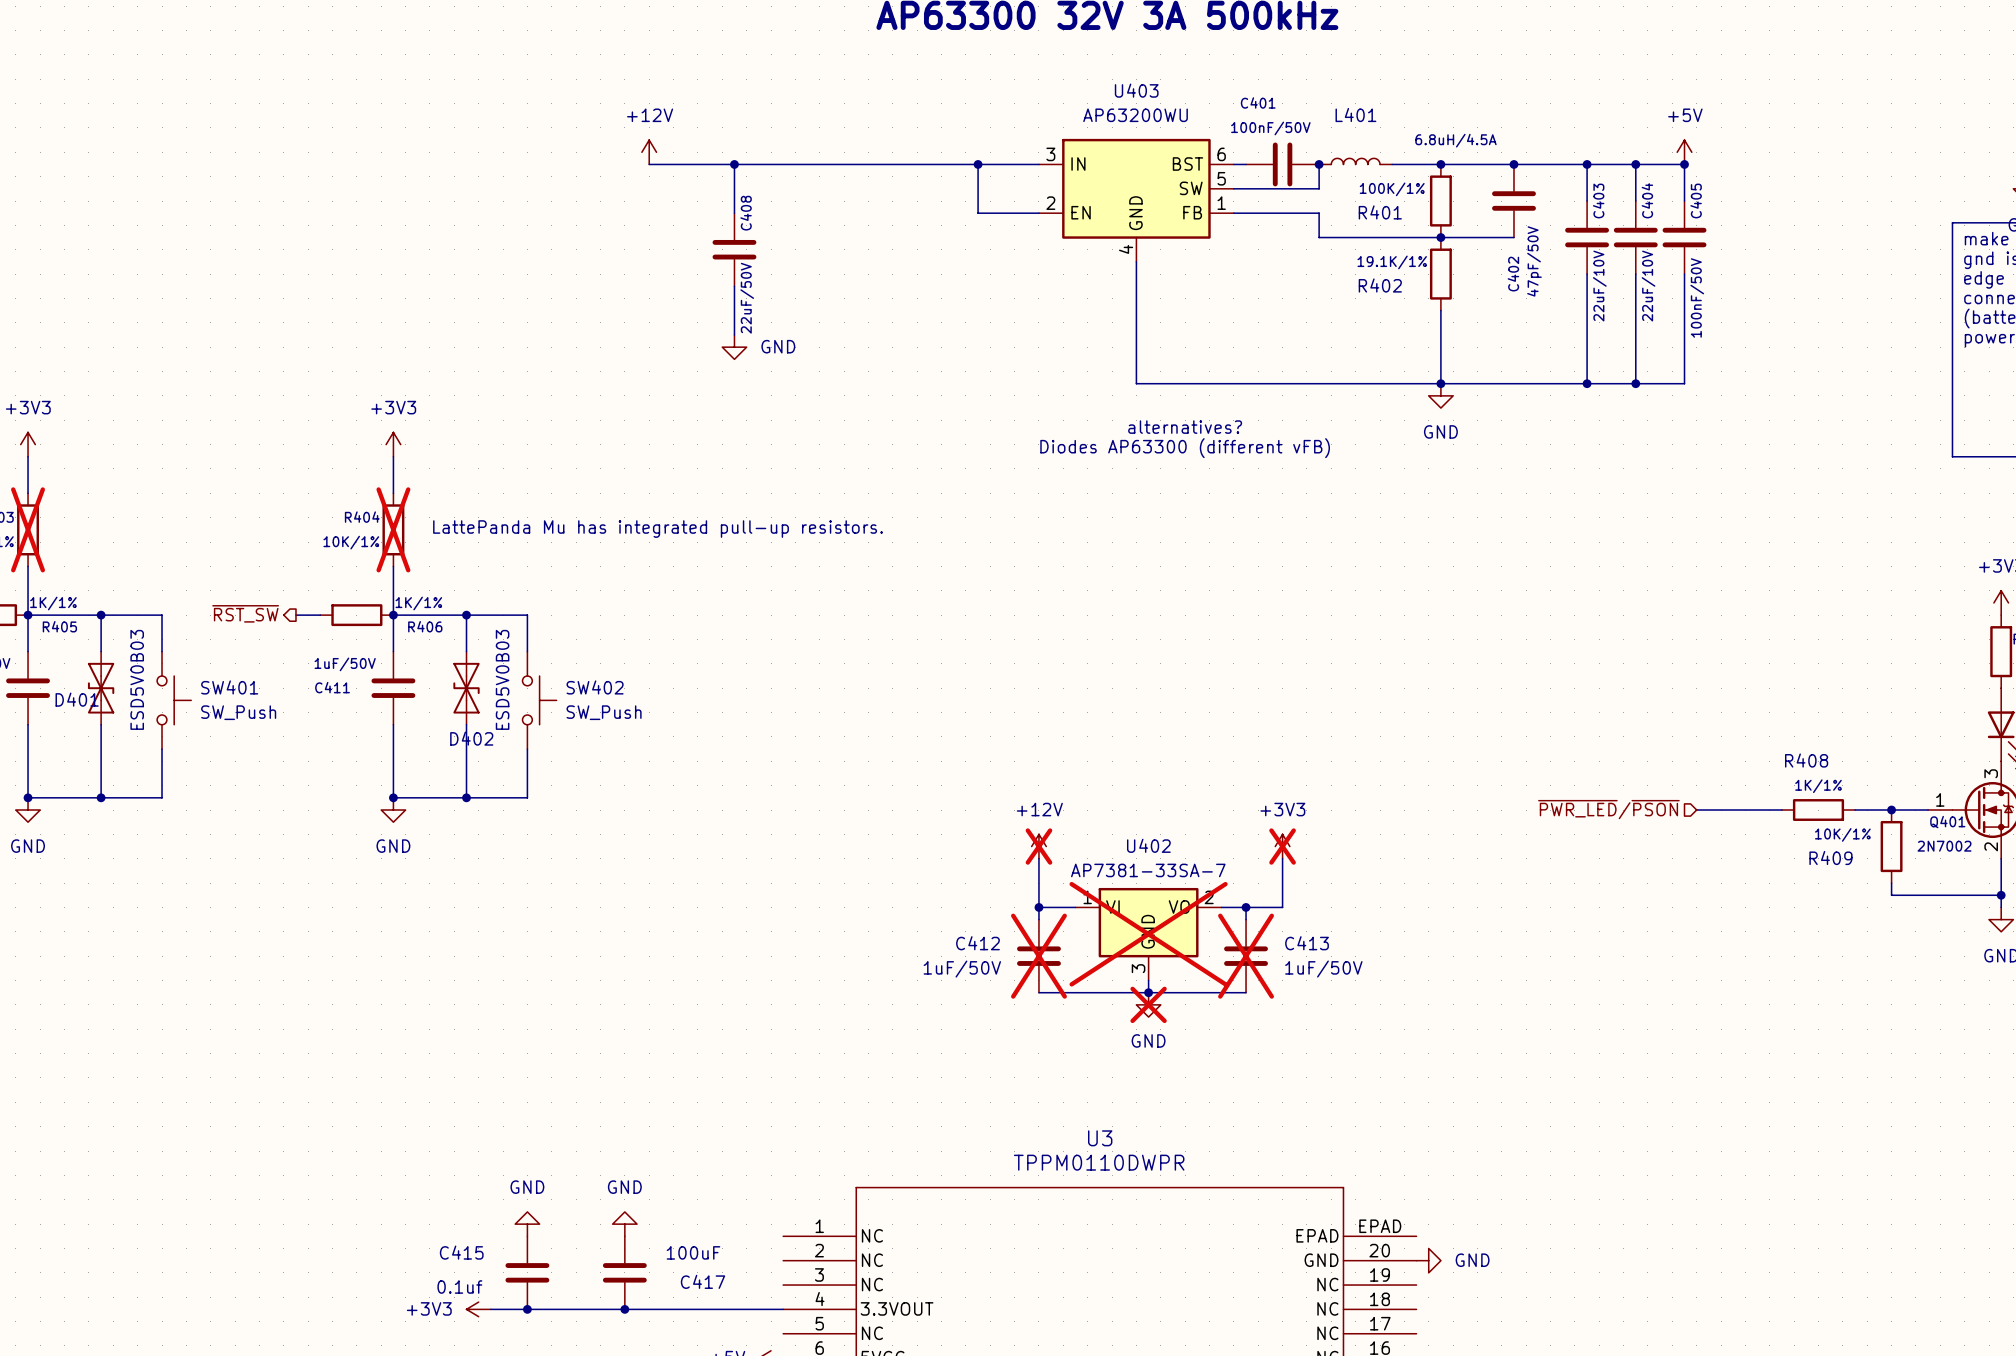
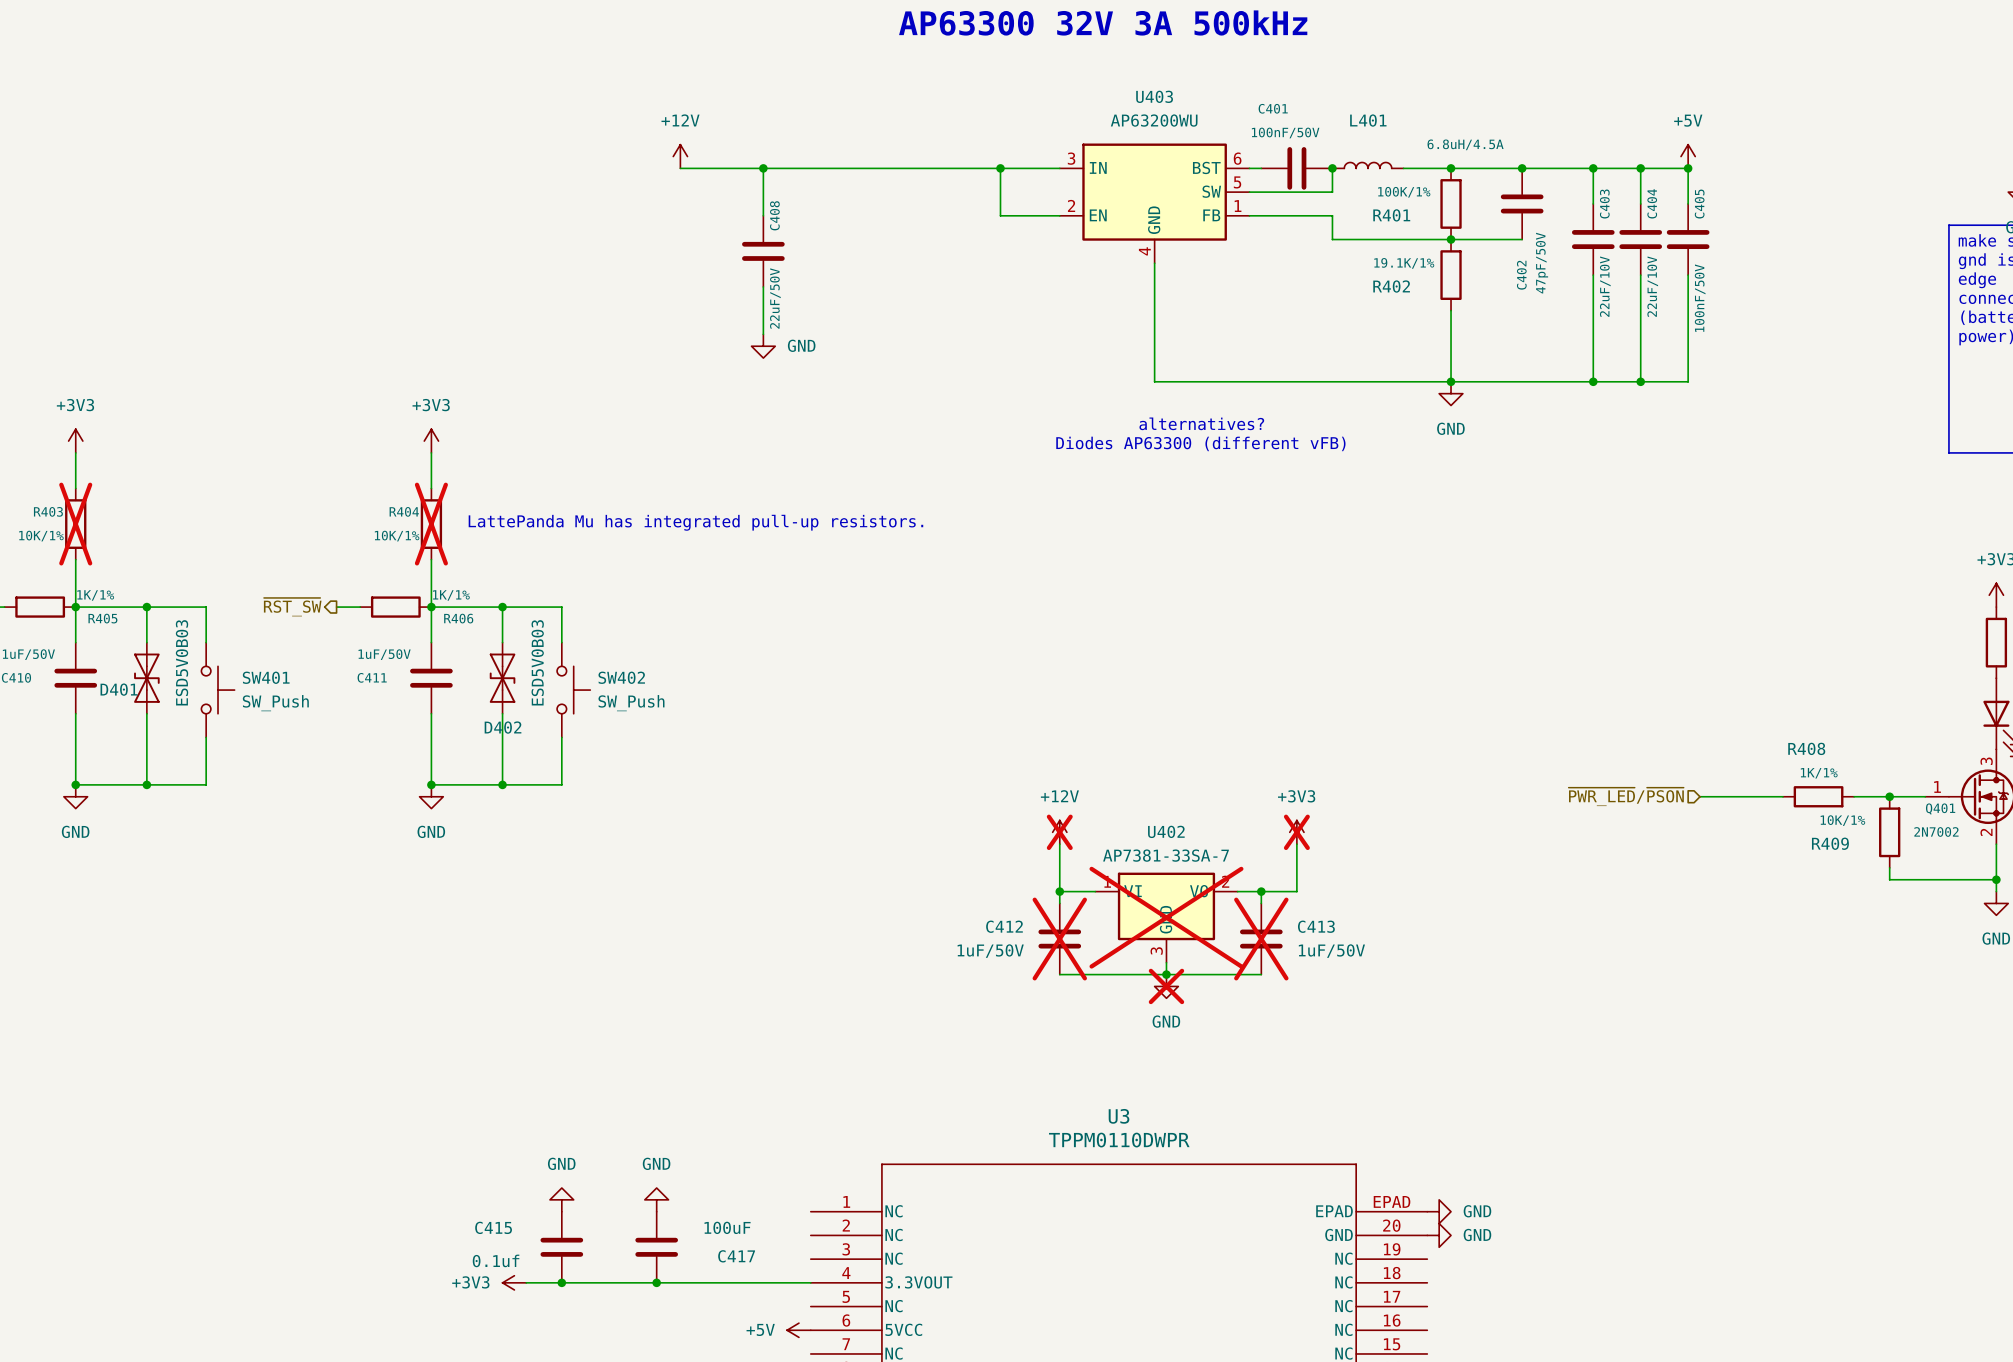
power symbol: none -> GND (1439, 1211)

